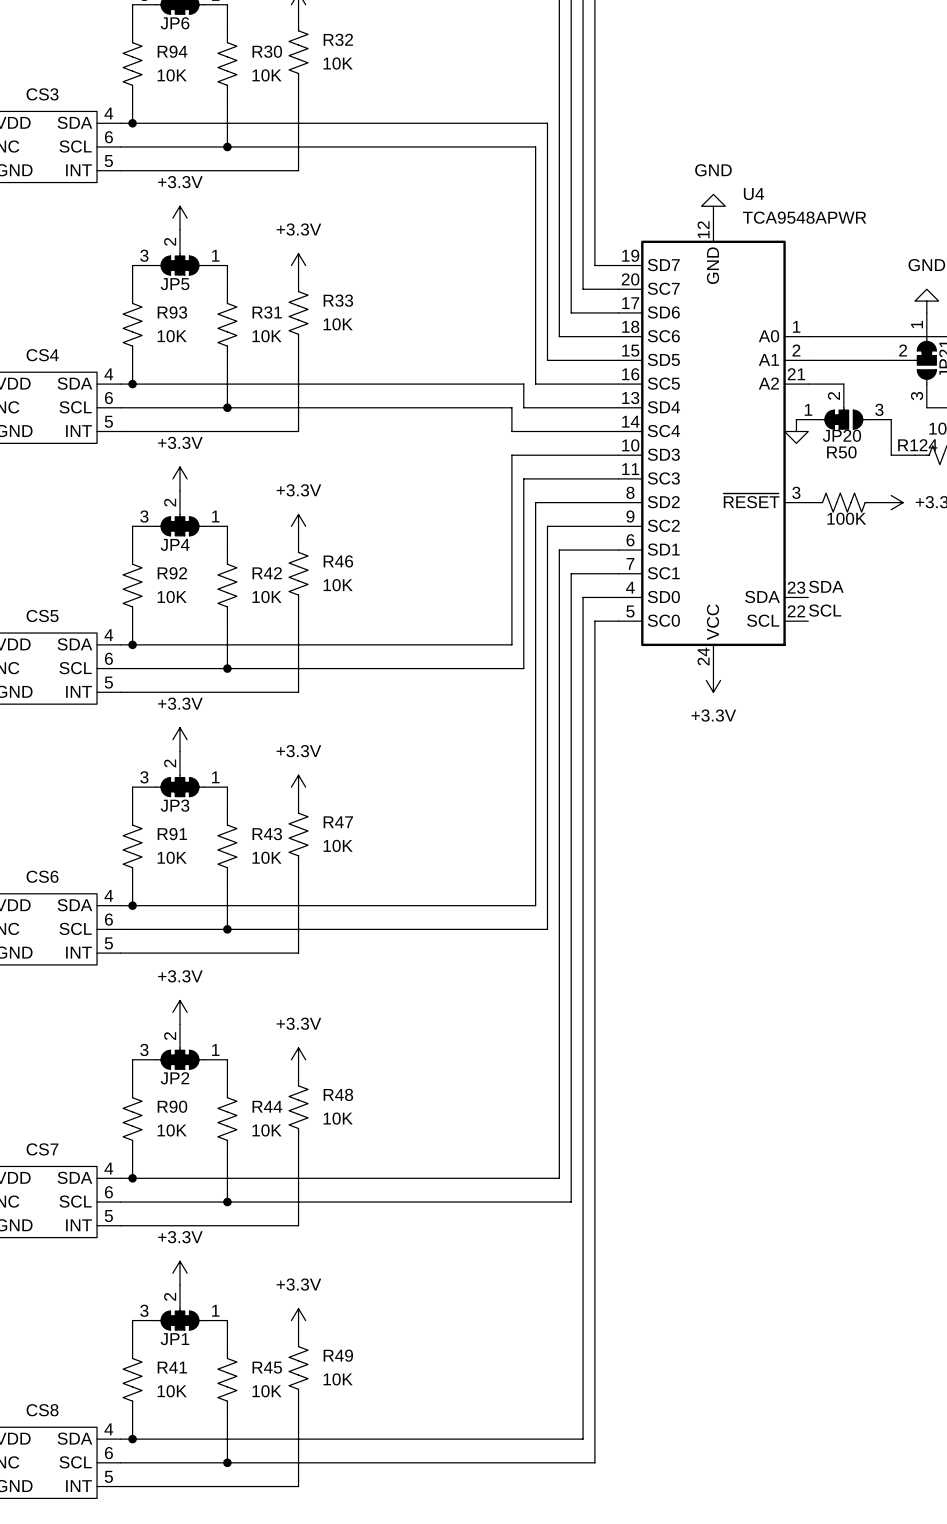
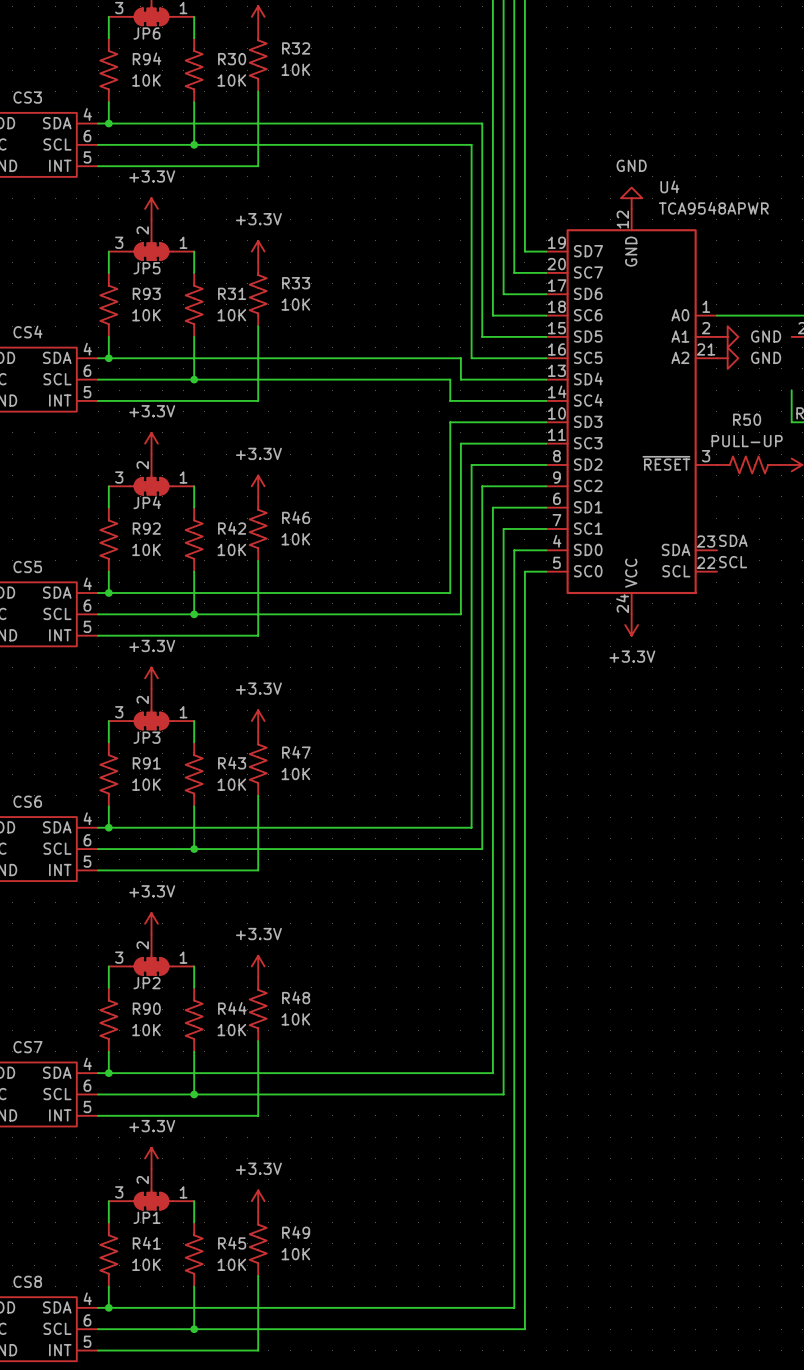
wire: (808, 360) (891, 360) -> none
power symbol: none -> GND (727, 336)
wire: (808, 384) (843, 384) -> none
power symbol: none -> GND (727, 358)
JP20: (843, 406) -> none
power symbol: (796, 431) -> none
R50 value: 100K (846, 518) -> PULL-UP (747, 441)

